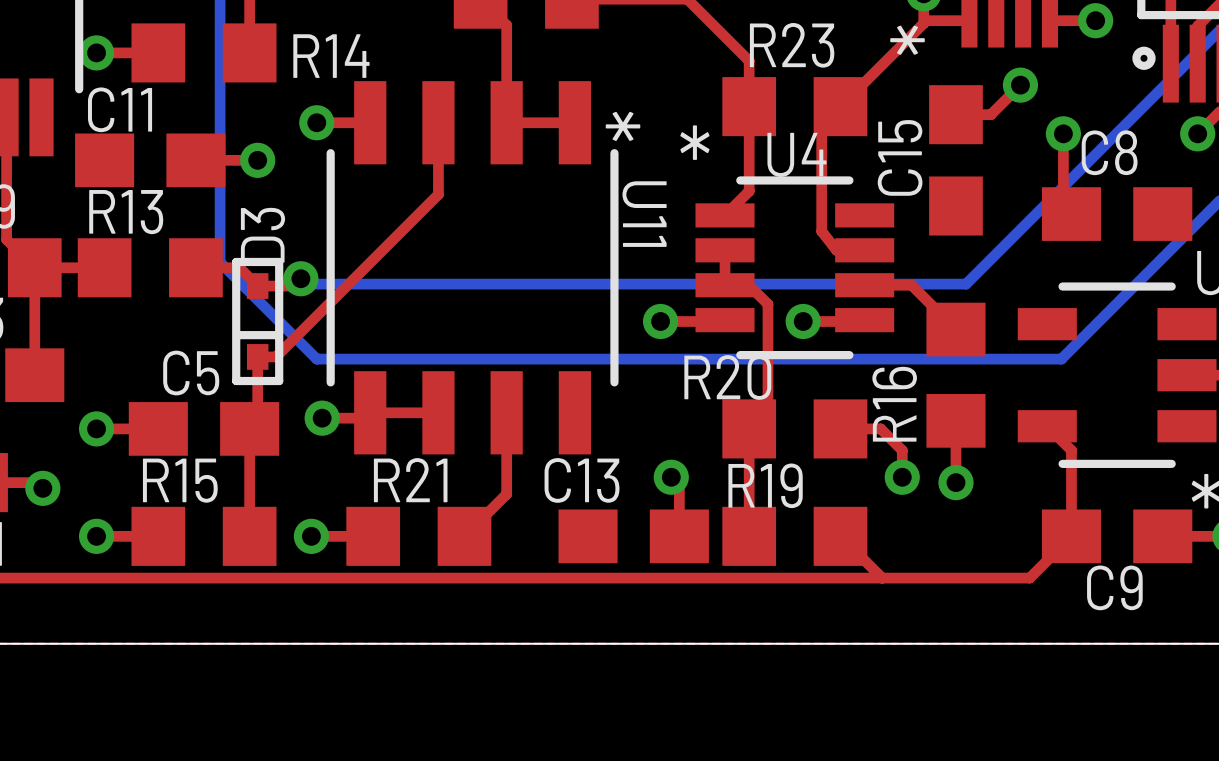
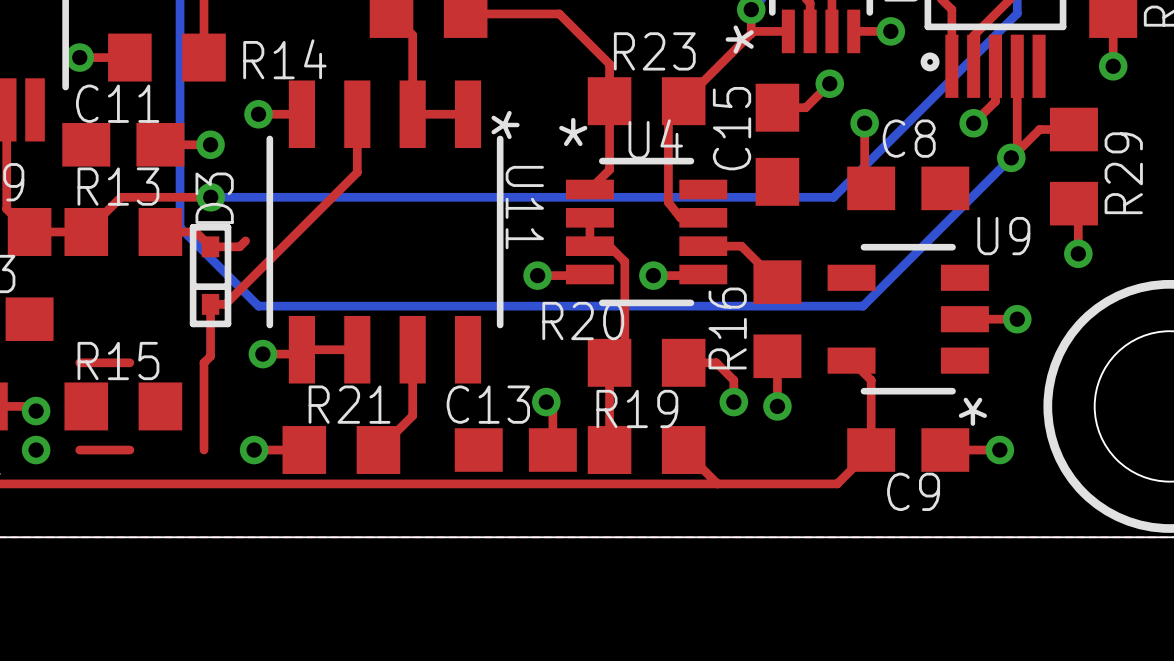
top track: none -> (210, 197) (120, 197) (86, 231)
bottom track: (1025, 225) (966, 284) (306, 284) (300, 278) -> (833, 197) (210, 197)
top track: (34, 267) (34, 375) -> none
via position: (300, 278) -> (210, 197)
via: (96, 428) -> none
C5: (203, 428) -> none
via position: (96, 536) -> (36, 450)
R15 position: (203, 536) -> (123, 406)

